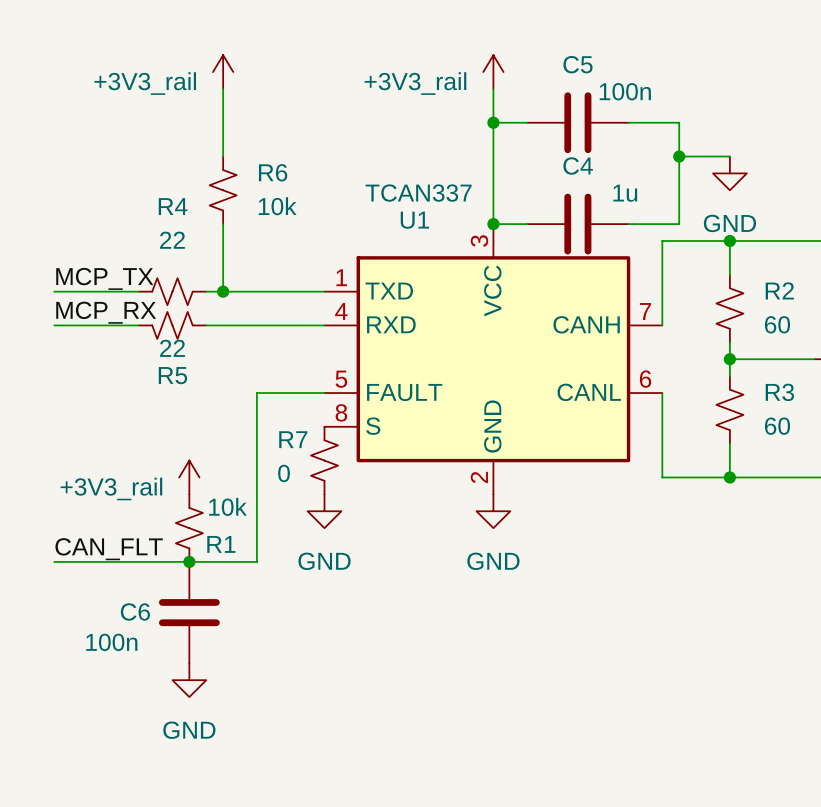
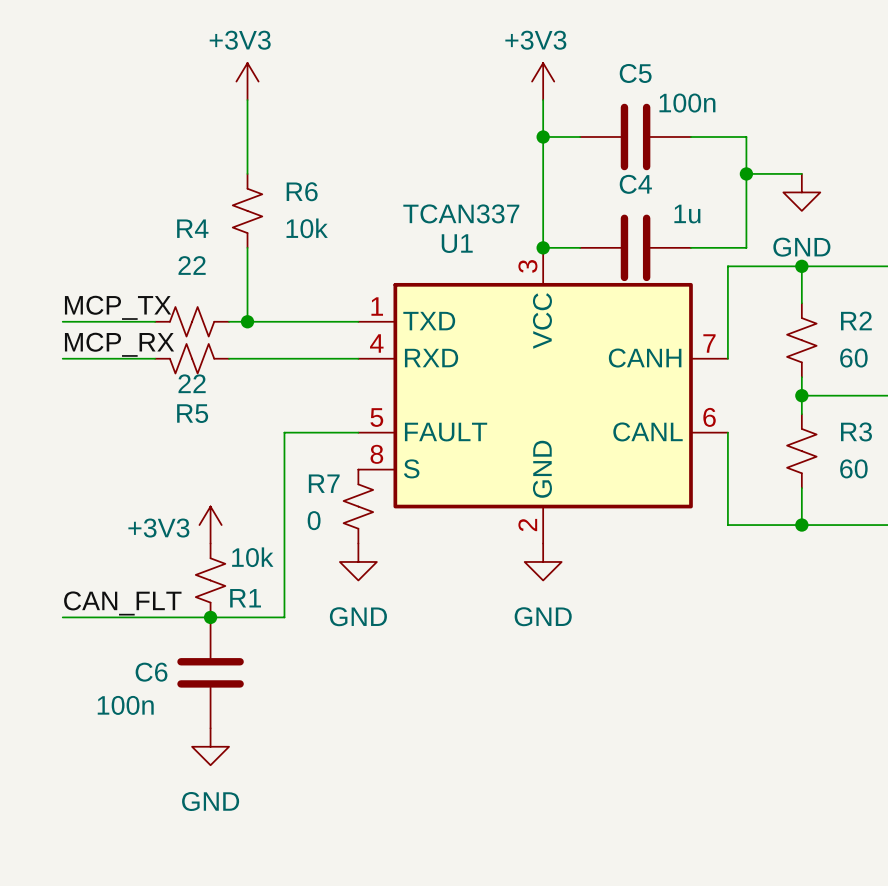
power symbol: +3V3_rail (223, 72) -> +3V3 (247, 81)
power symbol: +3V3_rail (493, 72) -> +3V3 (543, 81)
power symbol: +3V3_rail (189, 477) -> +3V3 (210, 525)

